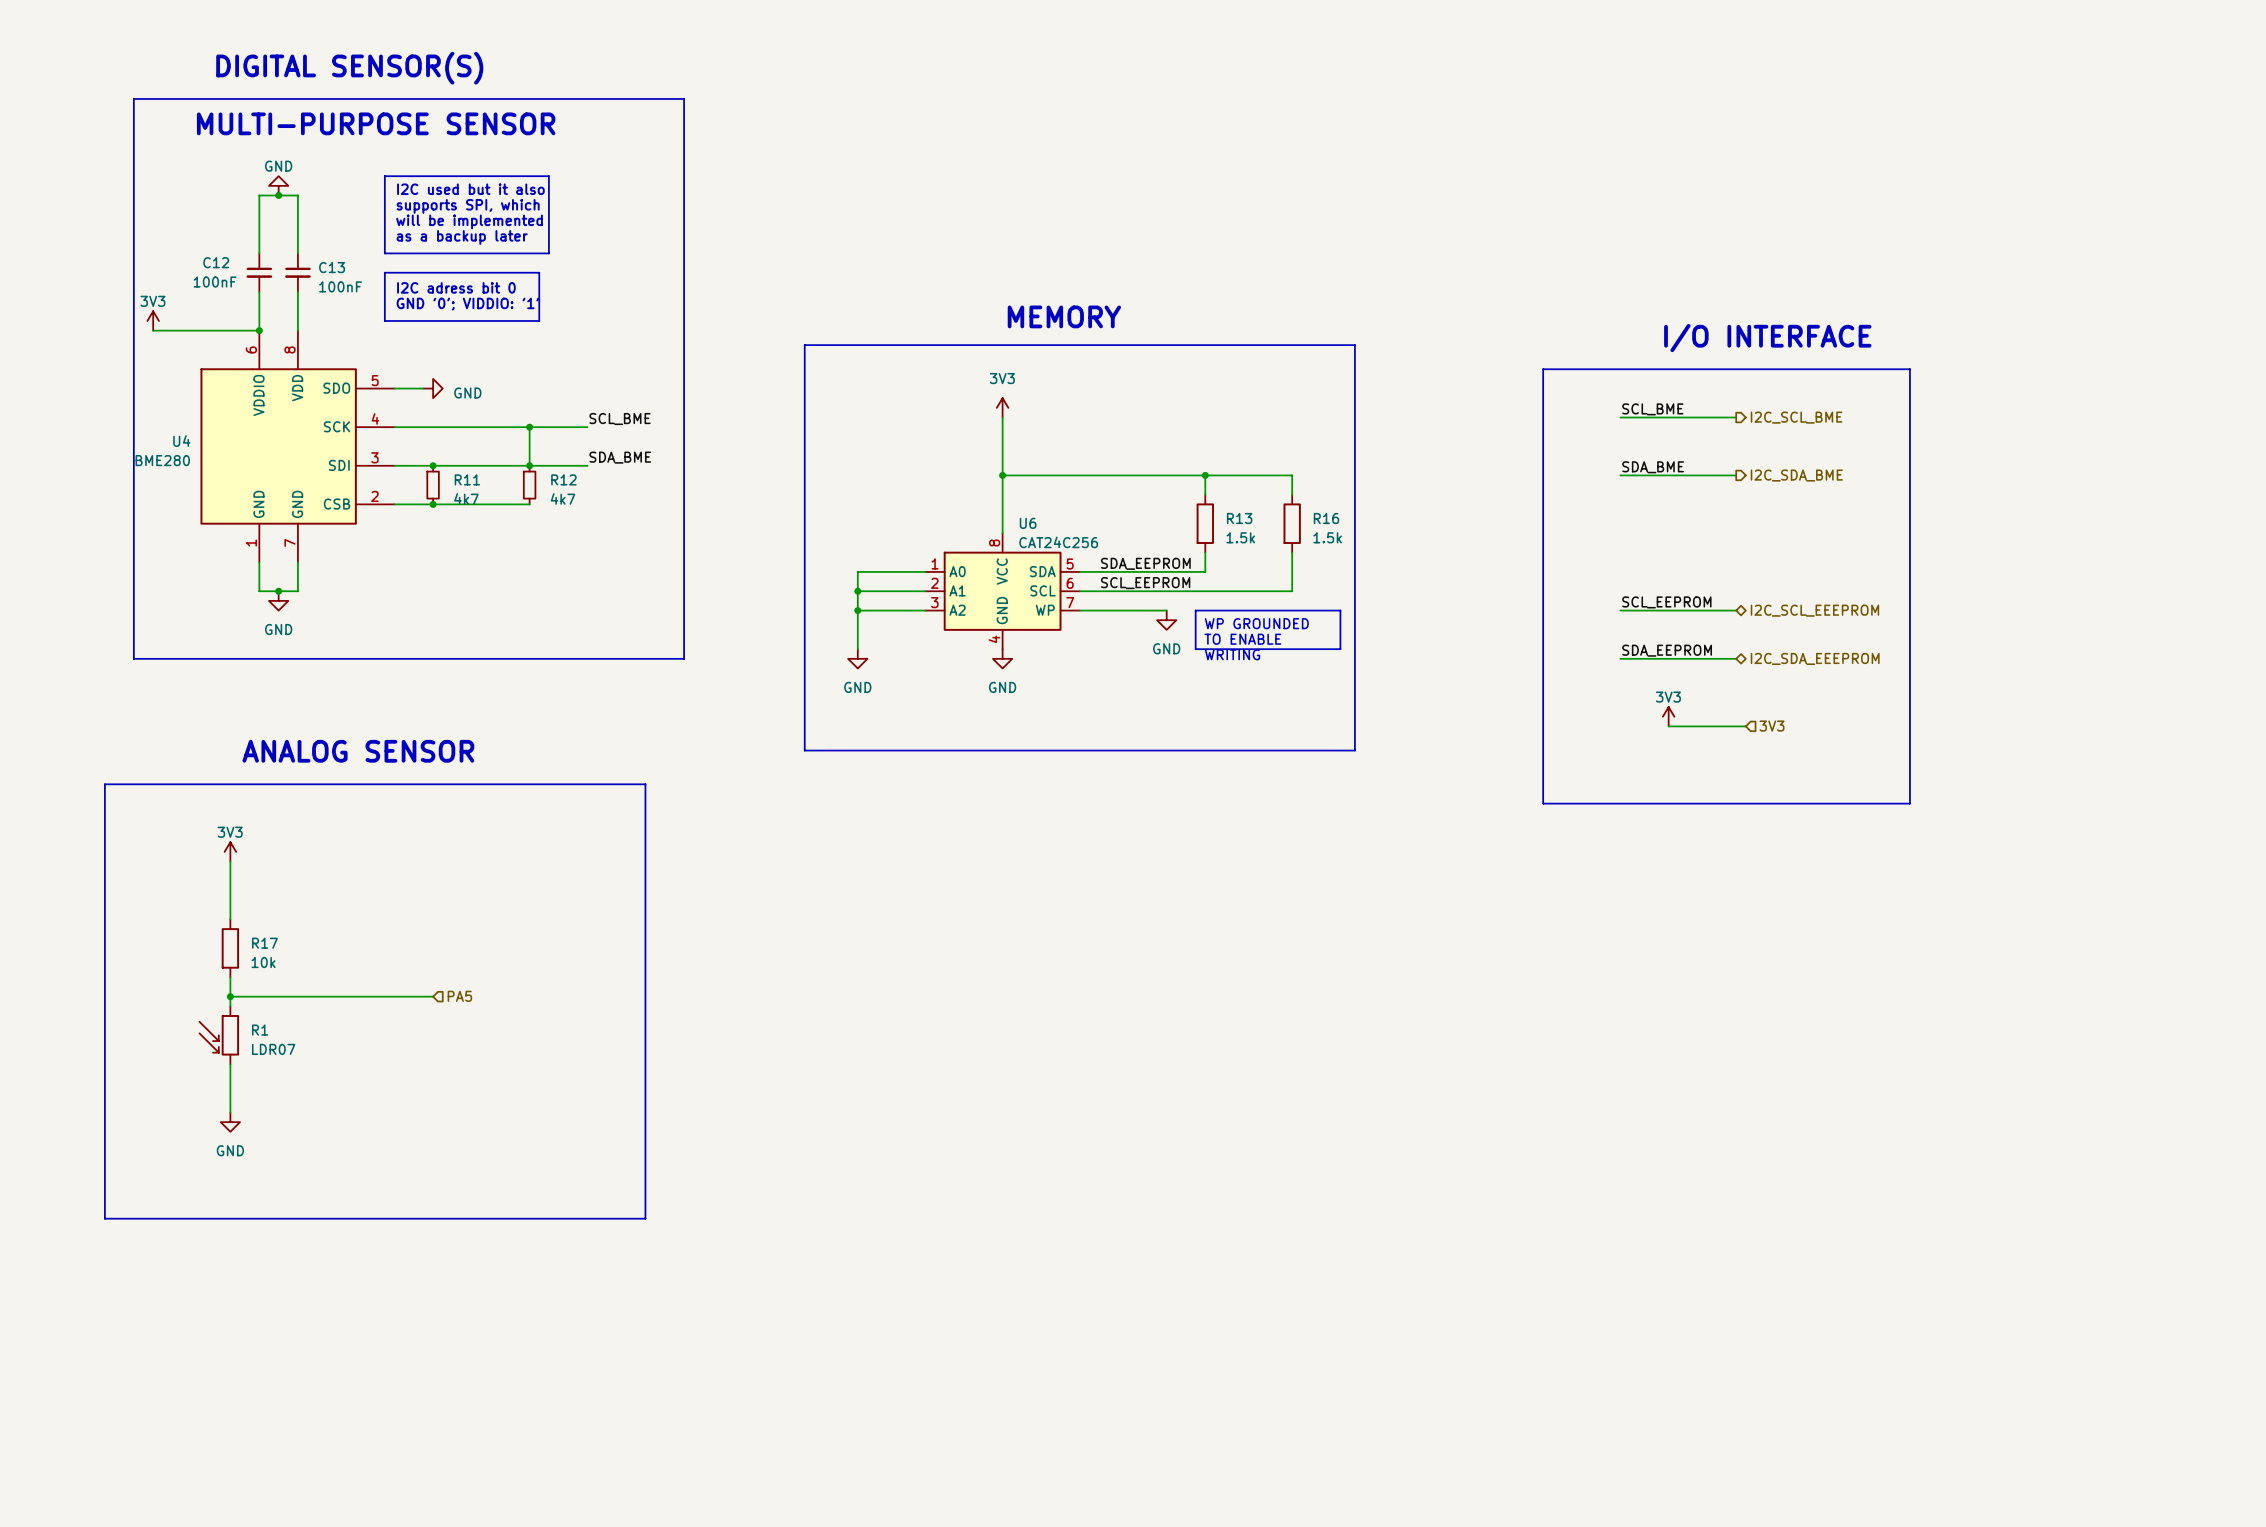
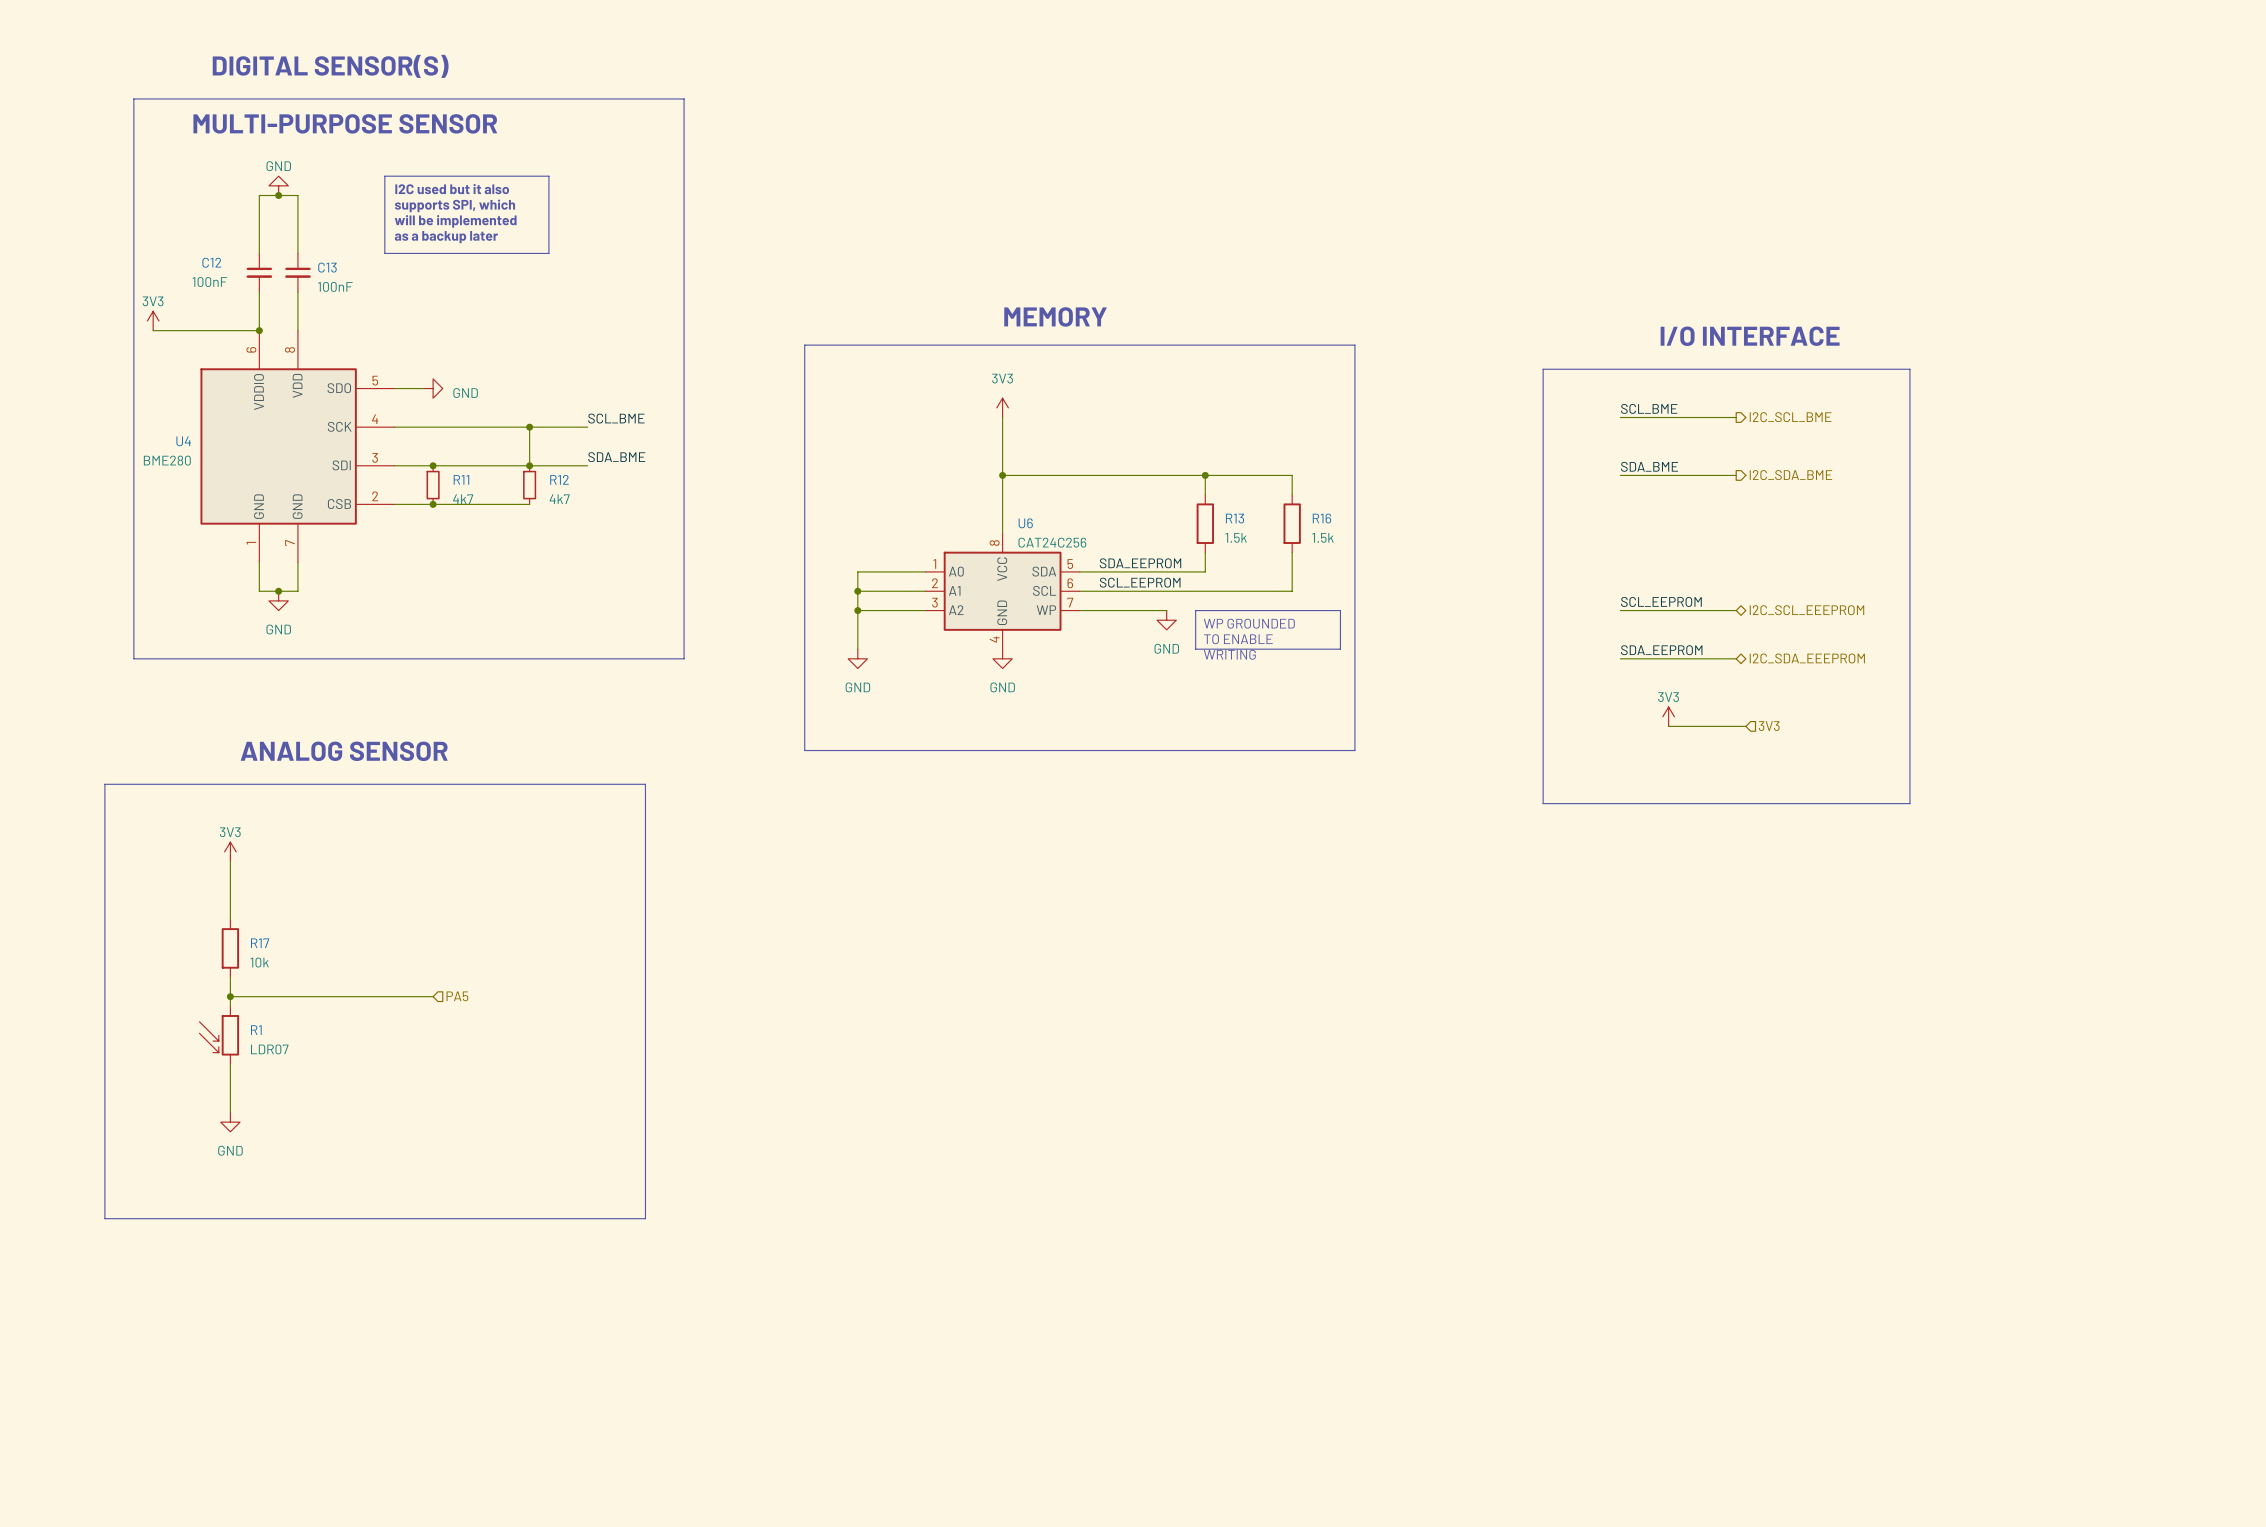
line: (384, 272) (539, 272) (539, 320) (384, 320) (384, 272) -> none
text: I2C adress bit 0 (456, 287) -> none
text: GND '0'; VIDDIO: '1' (467, 304) -> none

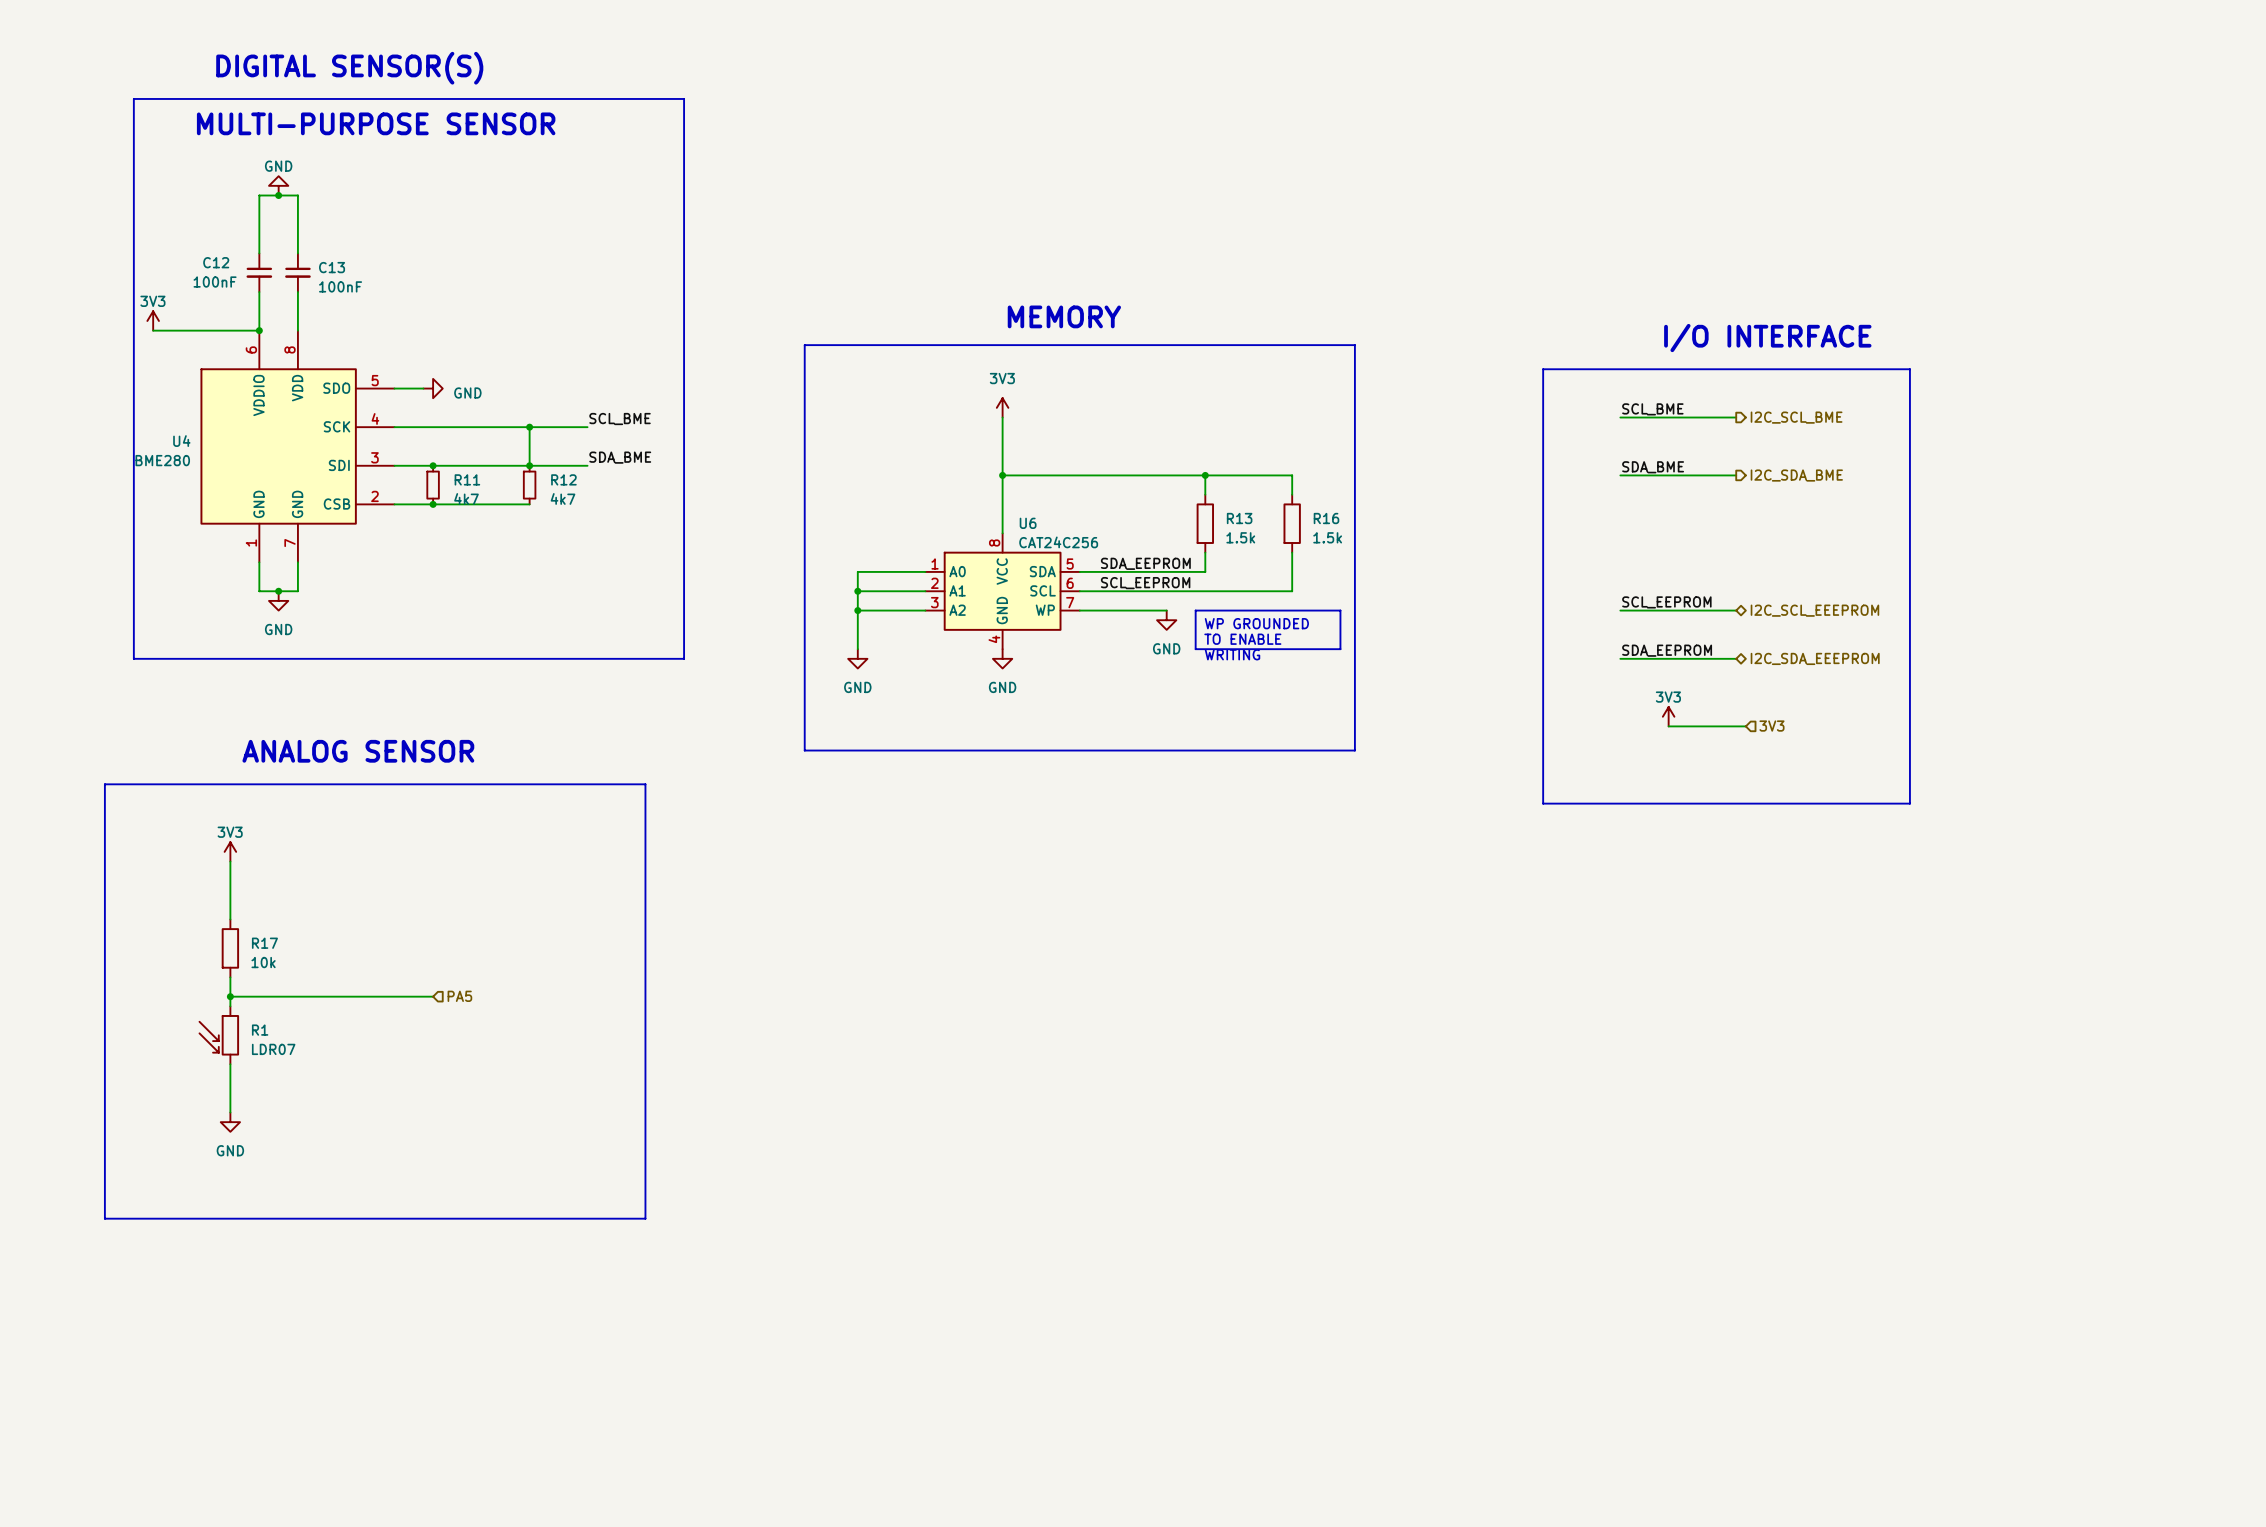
line: (384, 176) (548, 176) (548, 253) (384, 253) (384, 176) -> none
text: I2C used but it also (452, 189) -> none
text: supports SPI, which (455, 205) -> none
text: will be implemented (455, 221) -> none
text: as a backup later (446, 237) -> none

